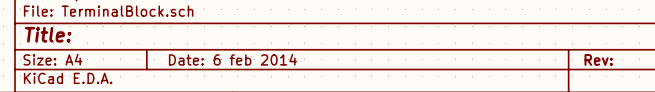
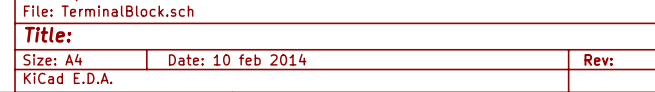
title block: Date: 6 feb 2014 (232, 59) -> Date: 10 feb 2014 (237, 59)

